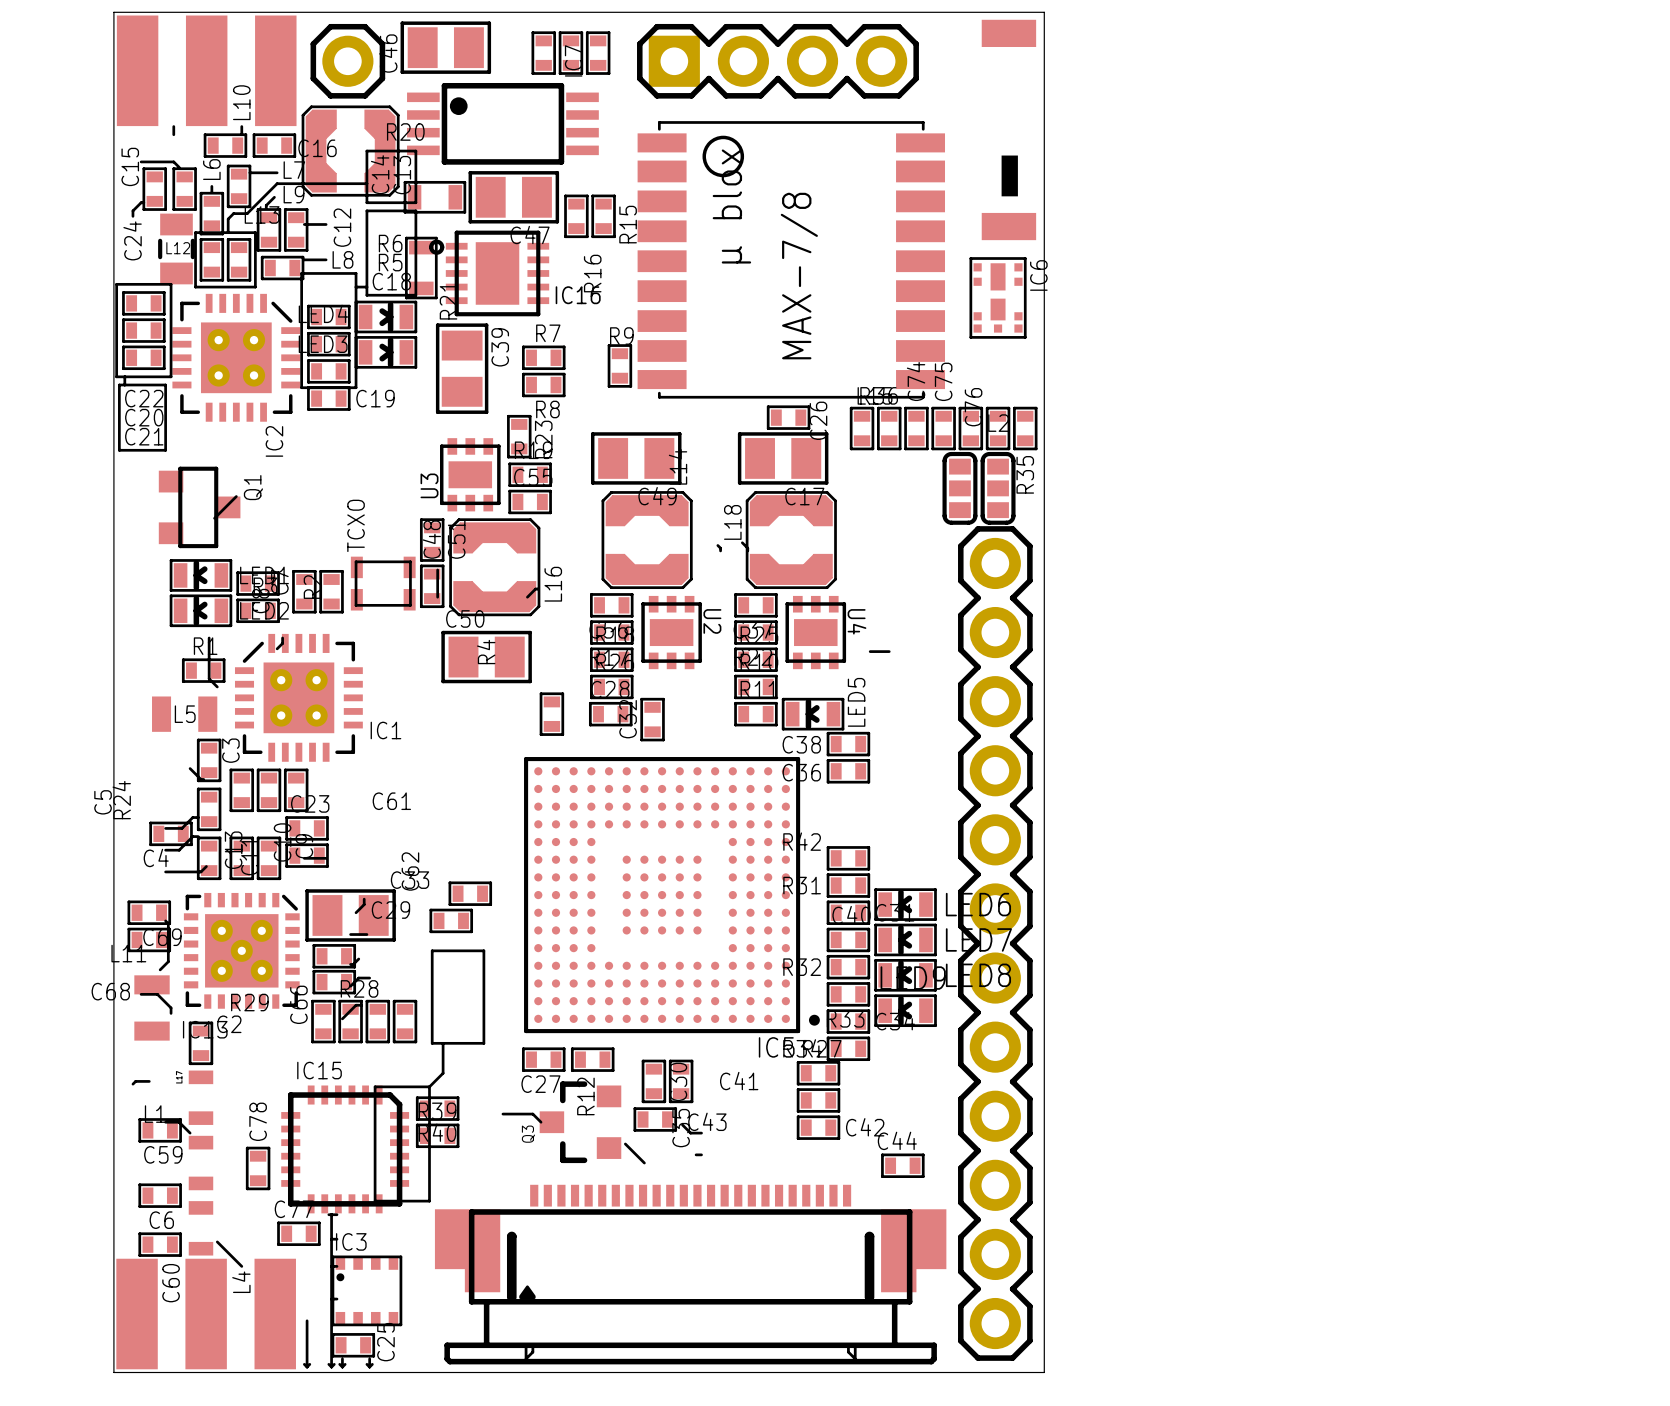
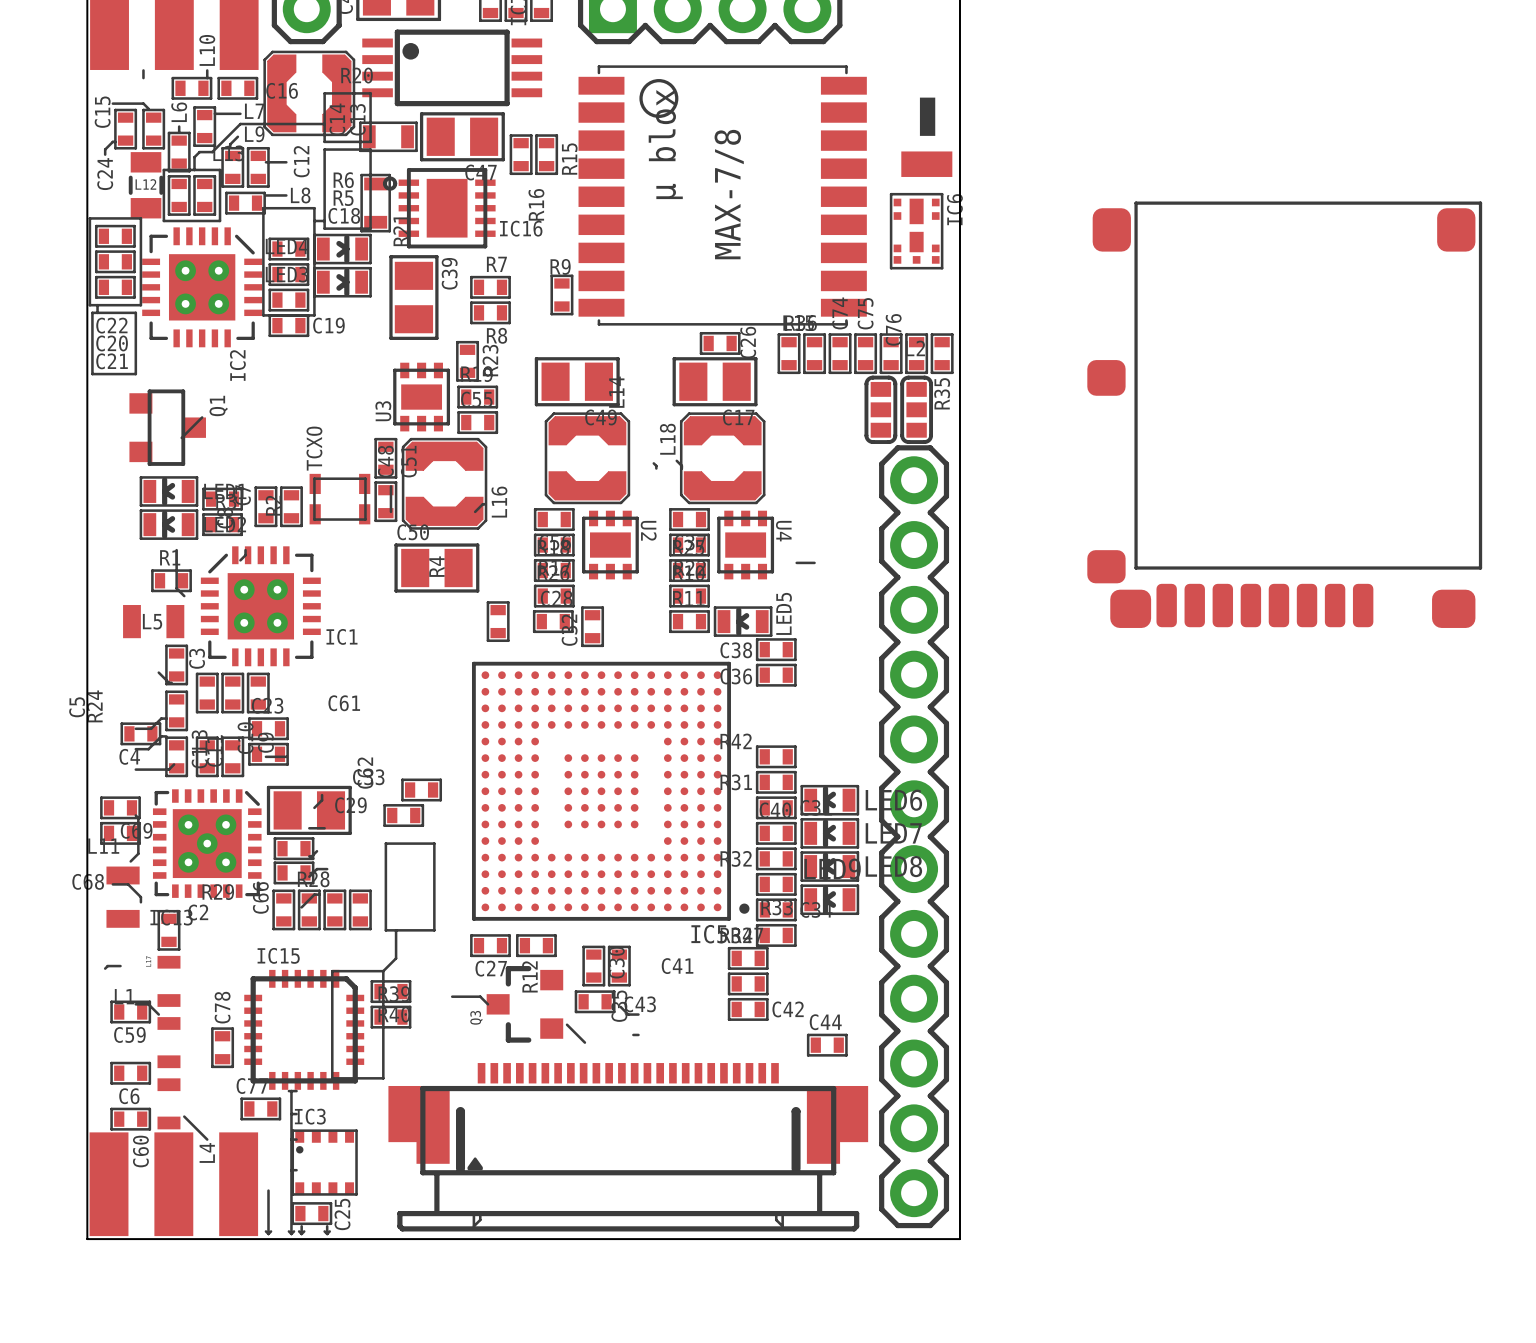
part: none -> (1284, 414)

